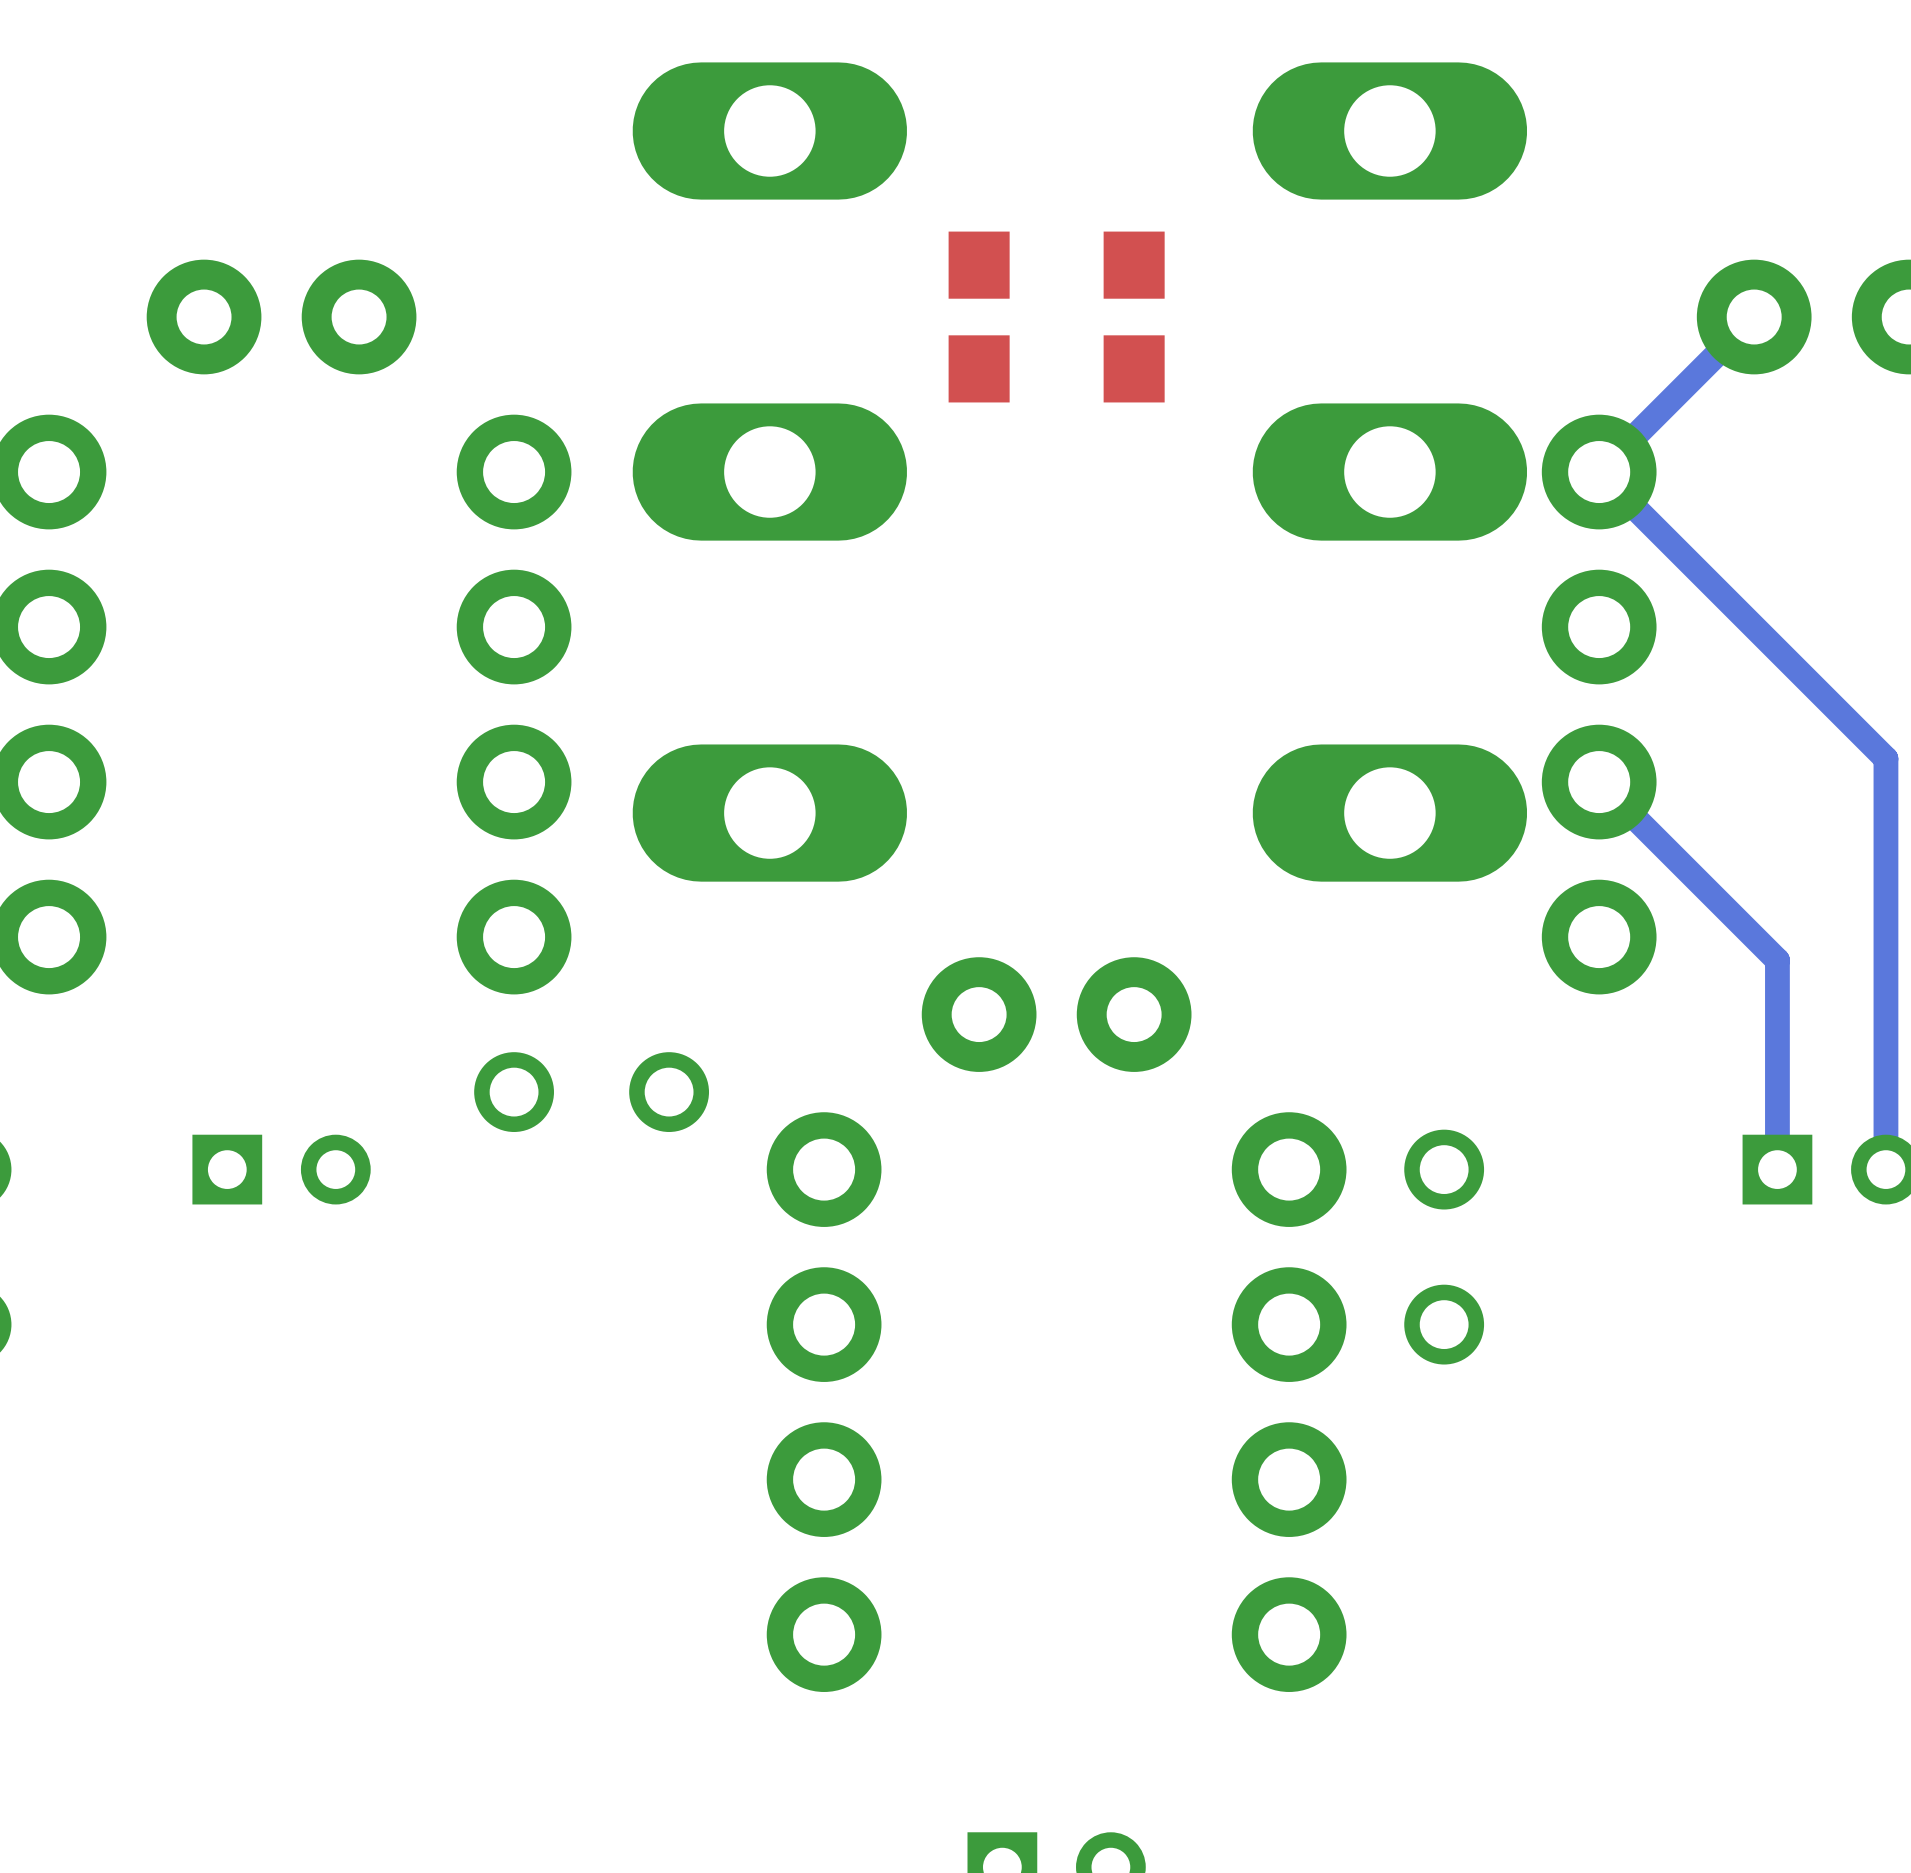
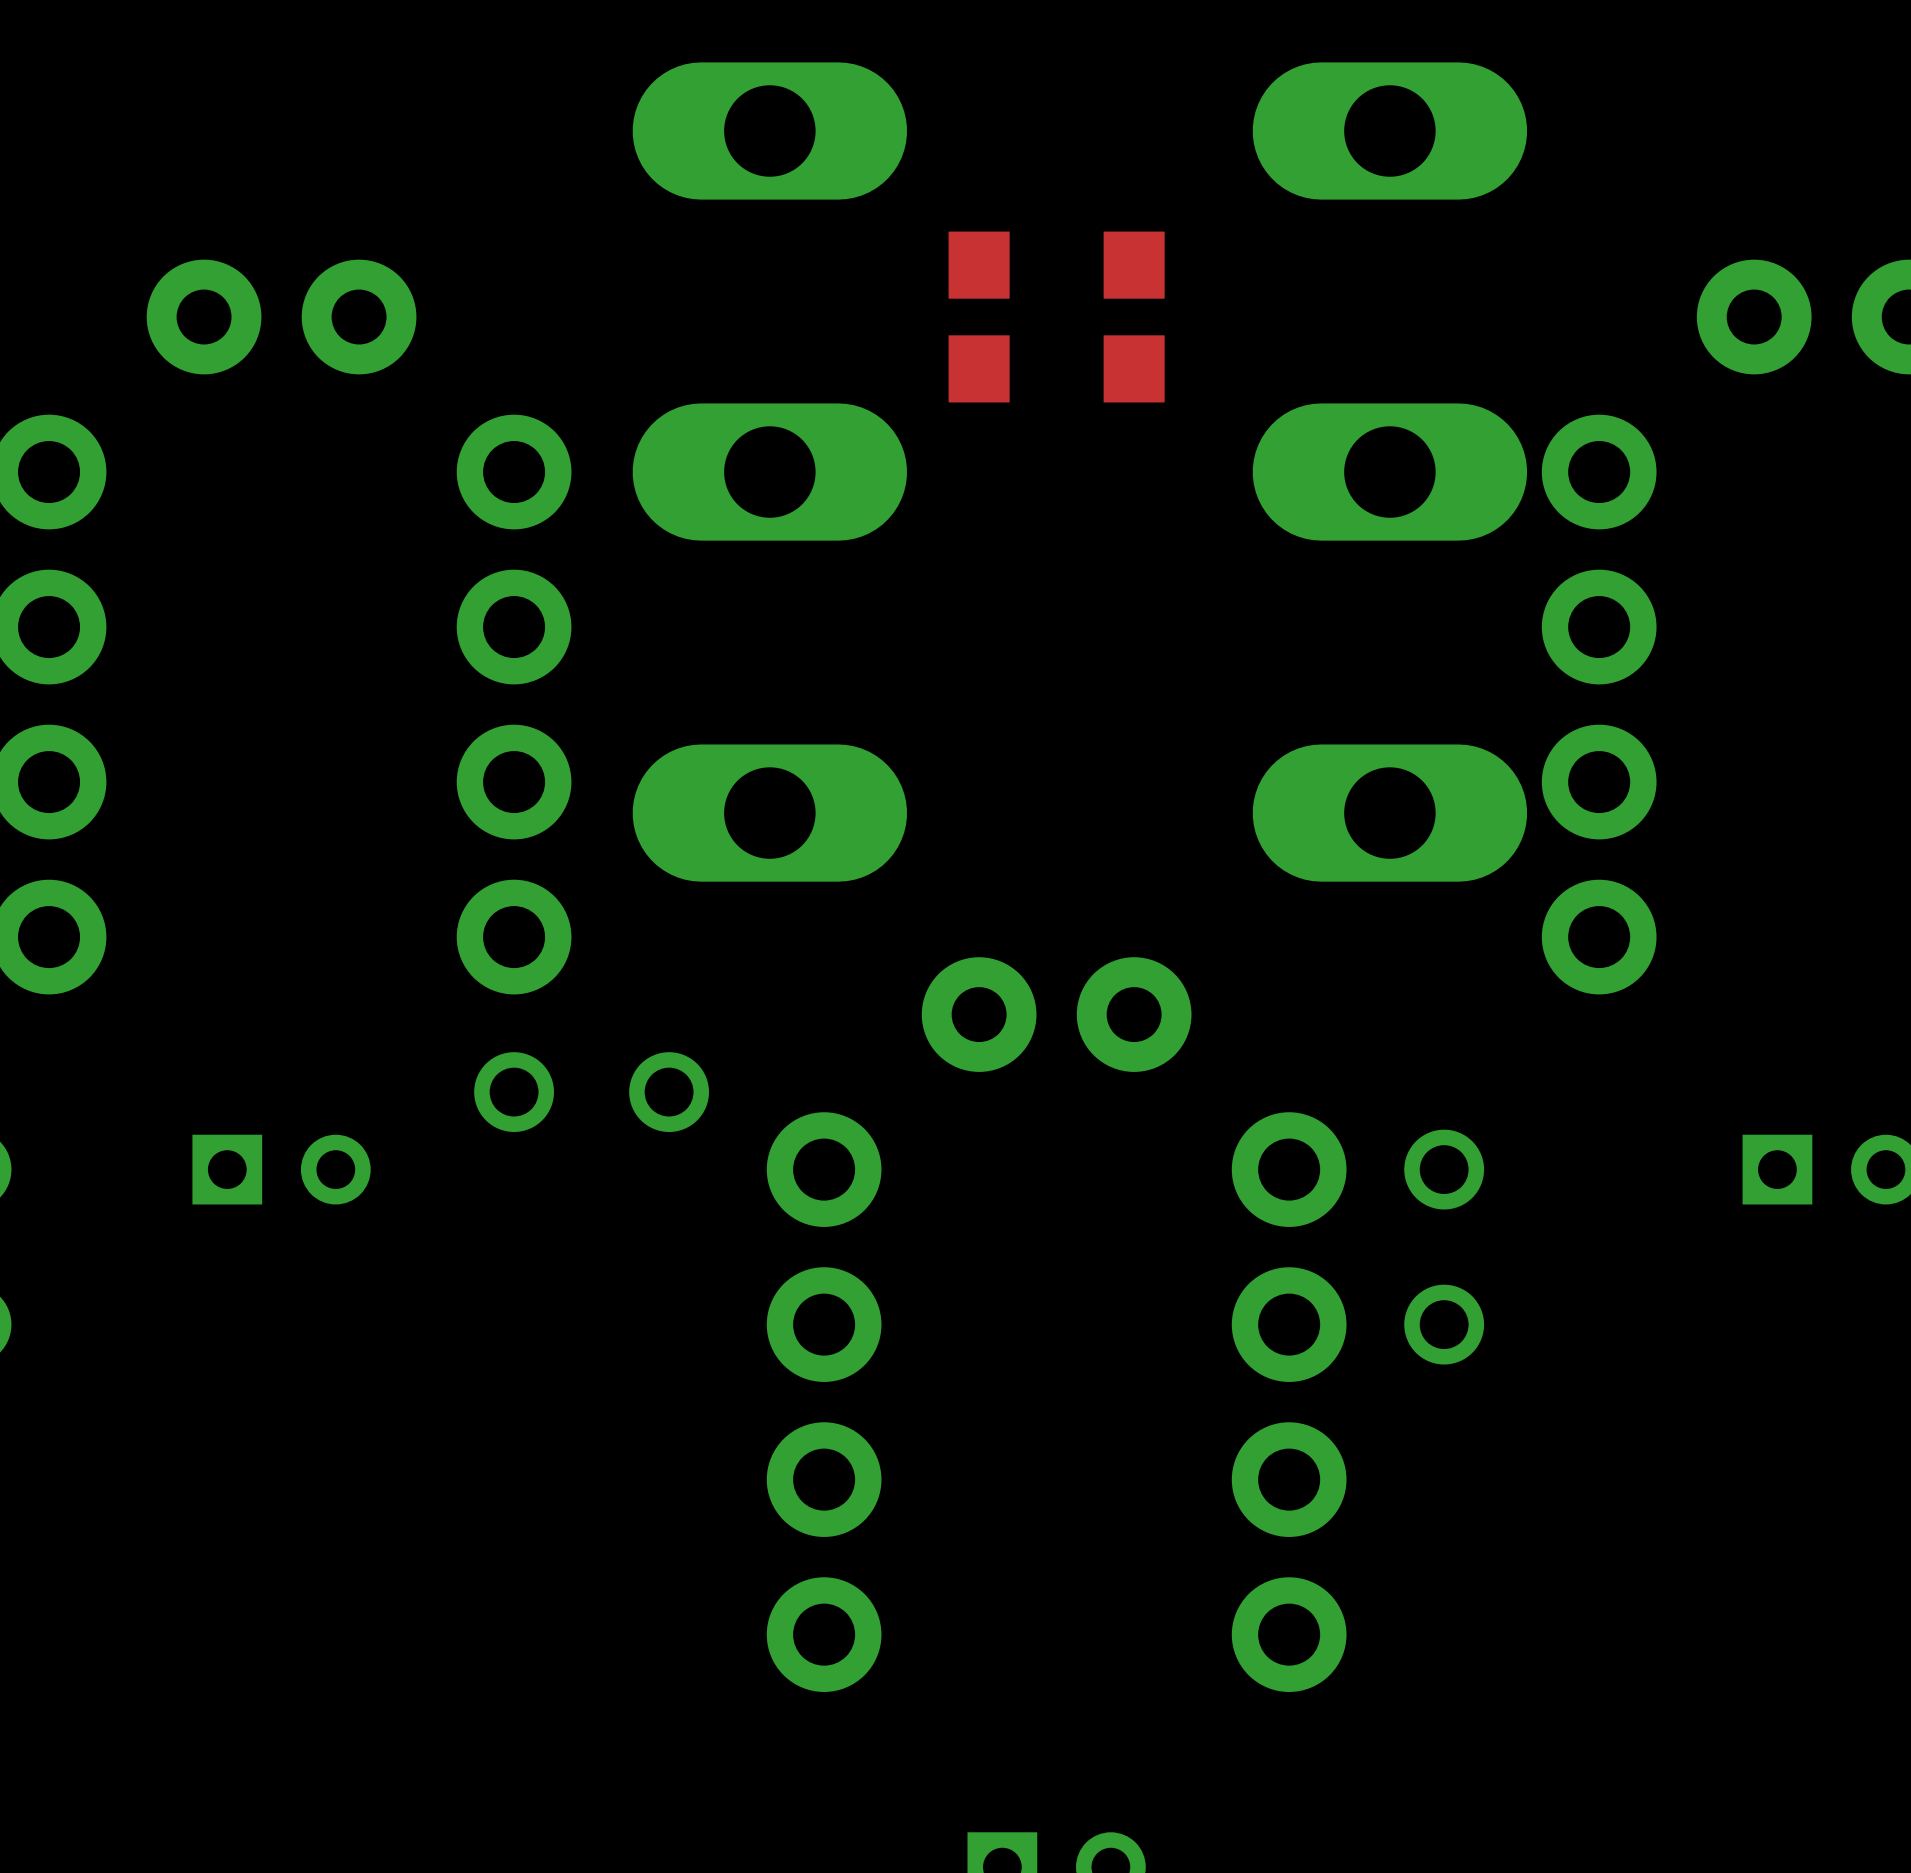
bottom track: (1754, 317) (1599, 472) (1885, 758) (1885, 1169) -> none
bottom track: (1599, 782) (1777, 960) (1777, 1169) -> none

